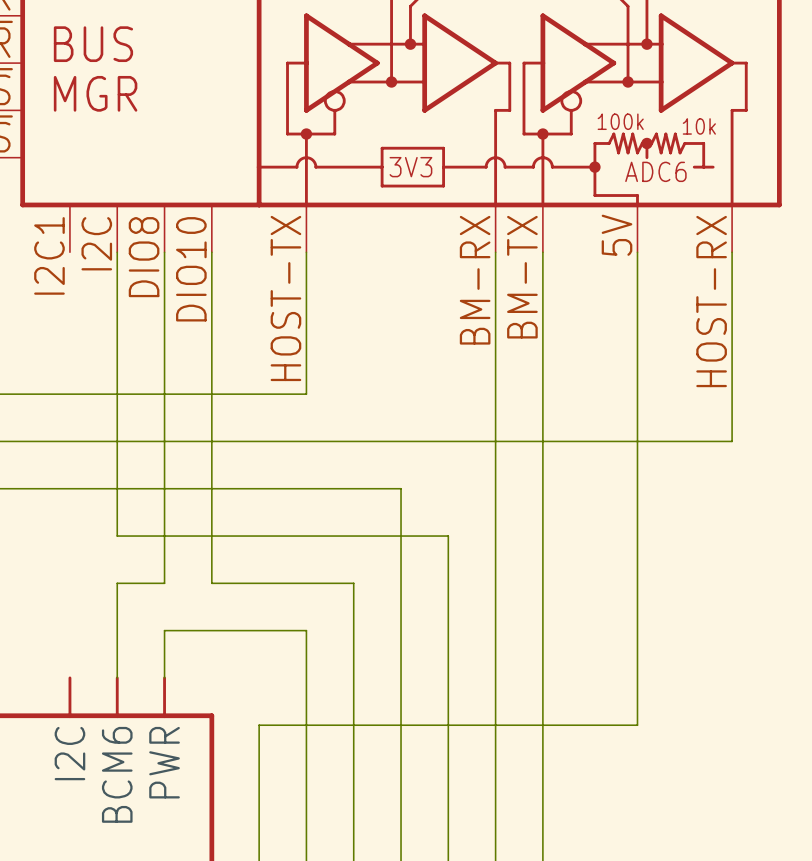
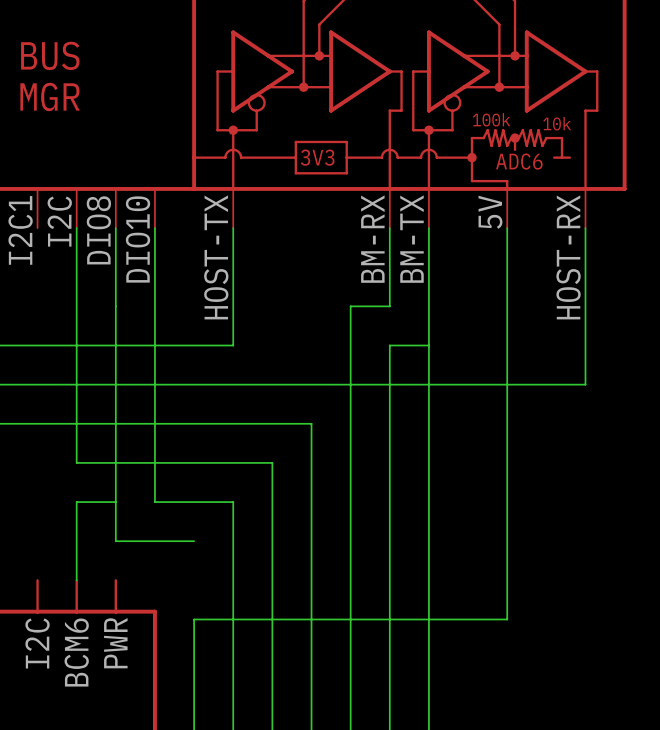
wire: (495, 346) (495, 394) -> (428, 345) (389, 345)
wire: (353, 536) (448, 536) -> (389, 306) (350, 306) (350, 462)
wire: (306, 583) (353, 583) -> (272, 462) (272, 502)
wire: (164, 630) (164, 677) -> (115, 541) (115, 502)
wire: (259, 630) (306, 630) -> (233, 502) (233, 541)

